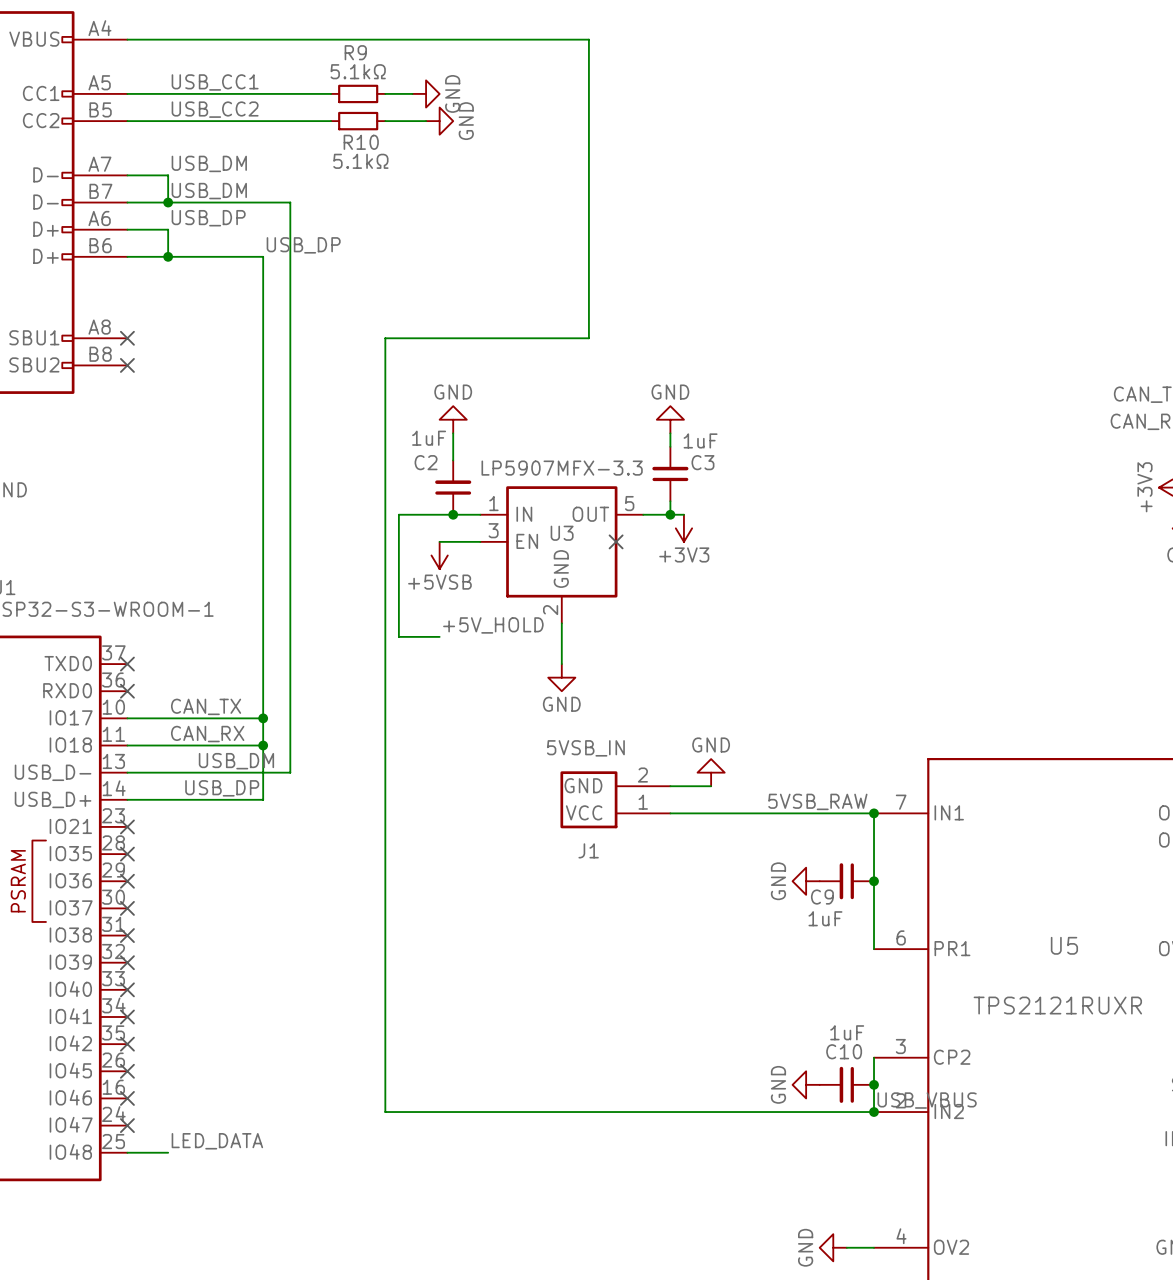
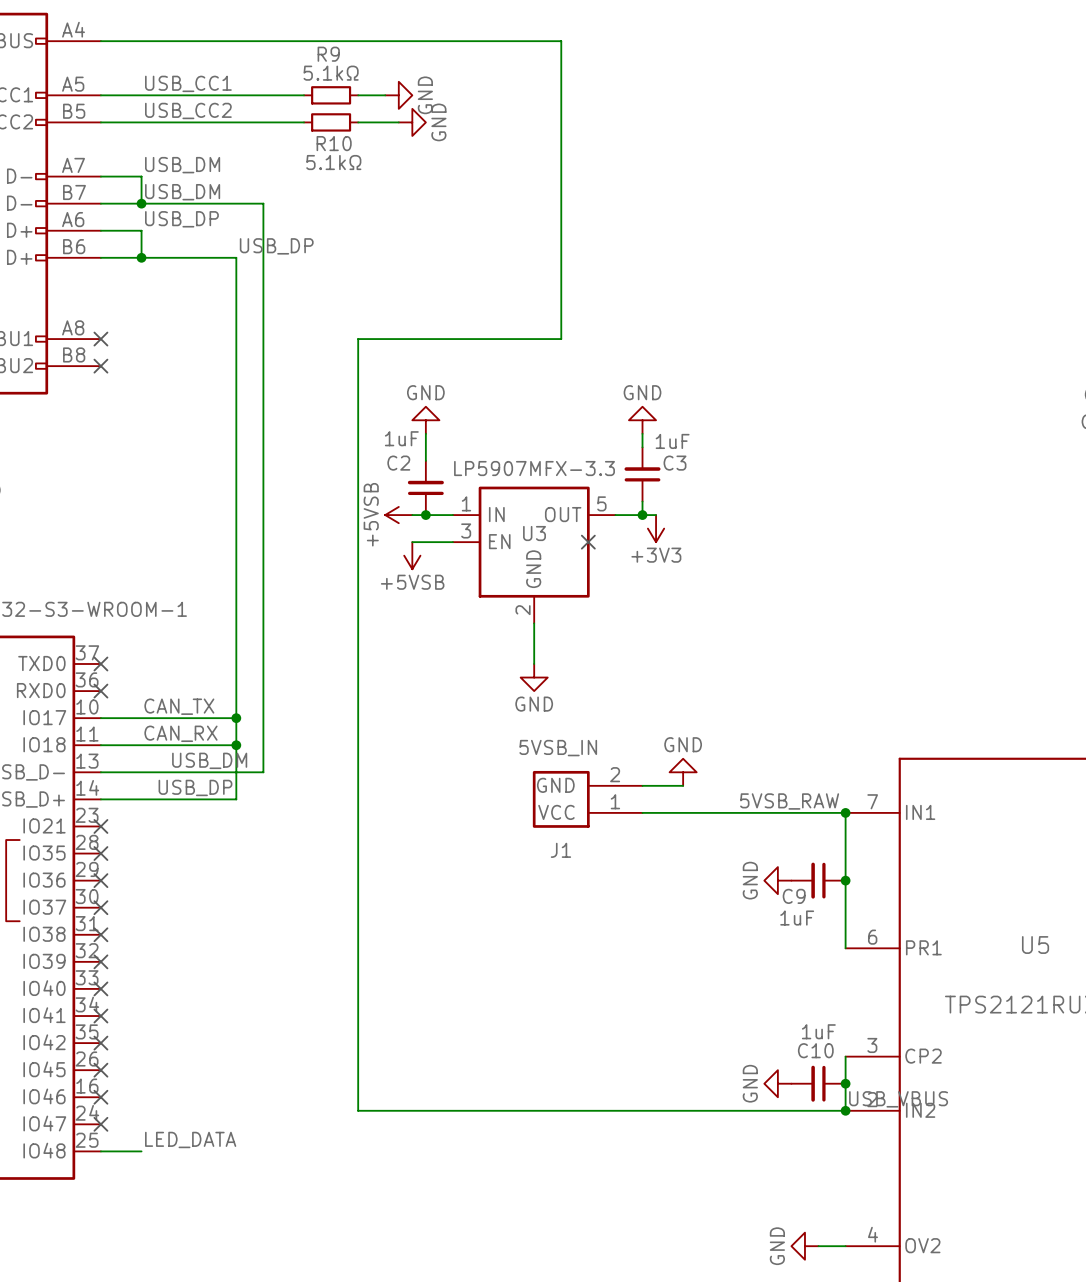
power symbol: none -> +5VSB (398, 515)
wire: (439, 514) (398, 514) (398, 636) (439, 636) -> none
label: +5V_HOLD (493, 625) -> none

